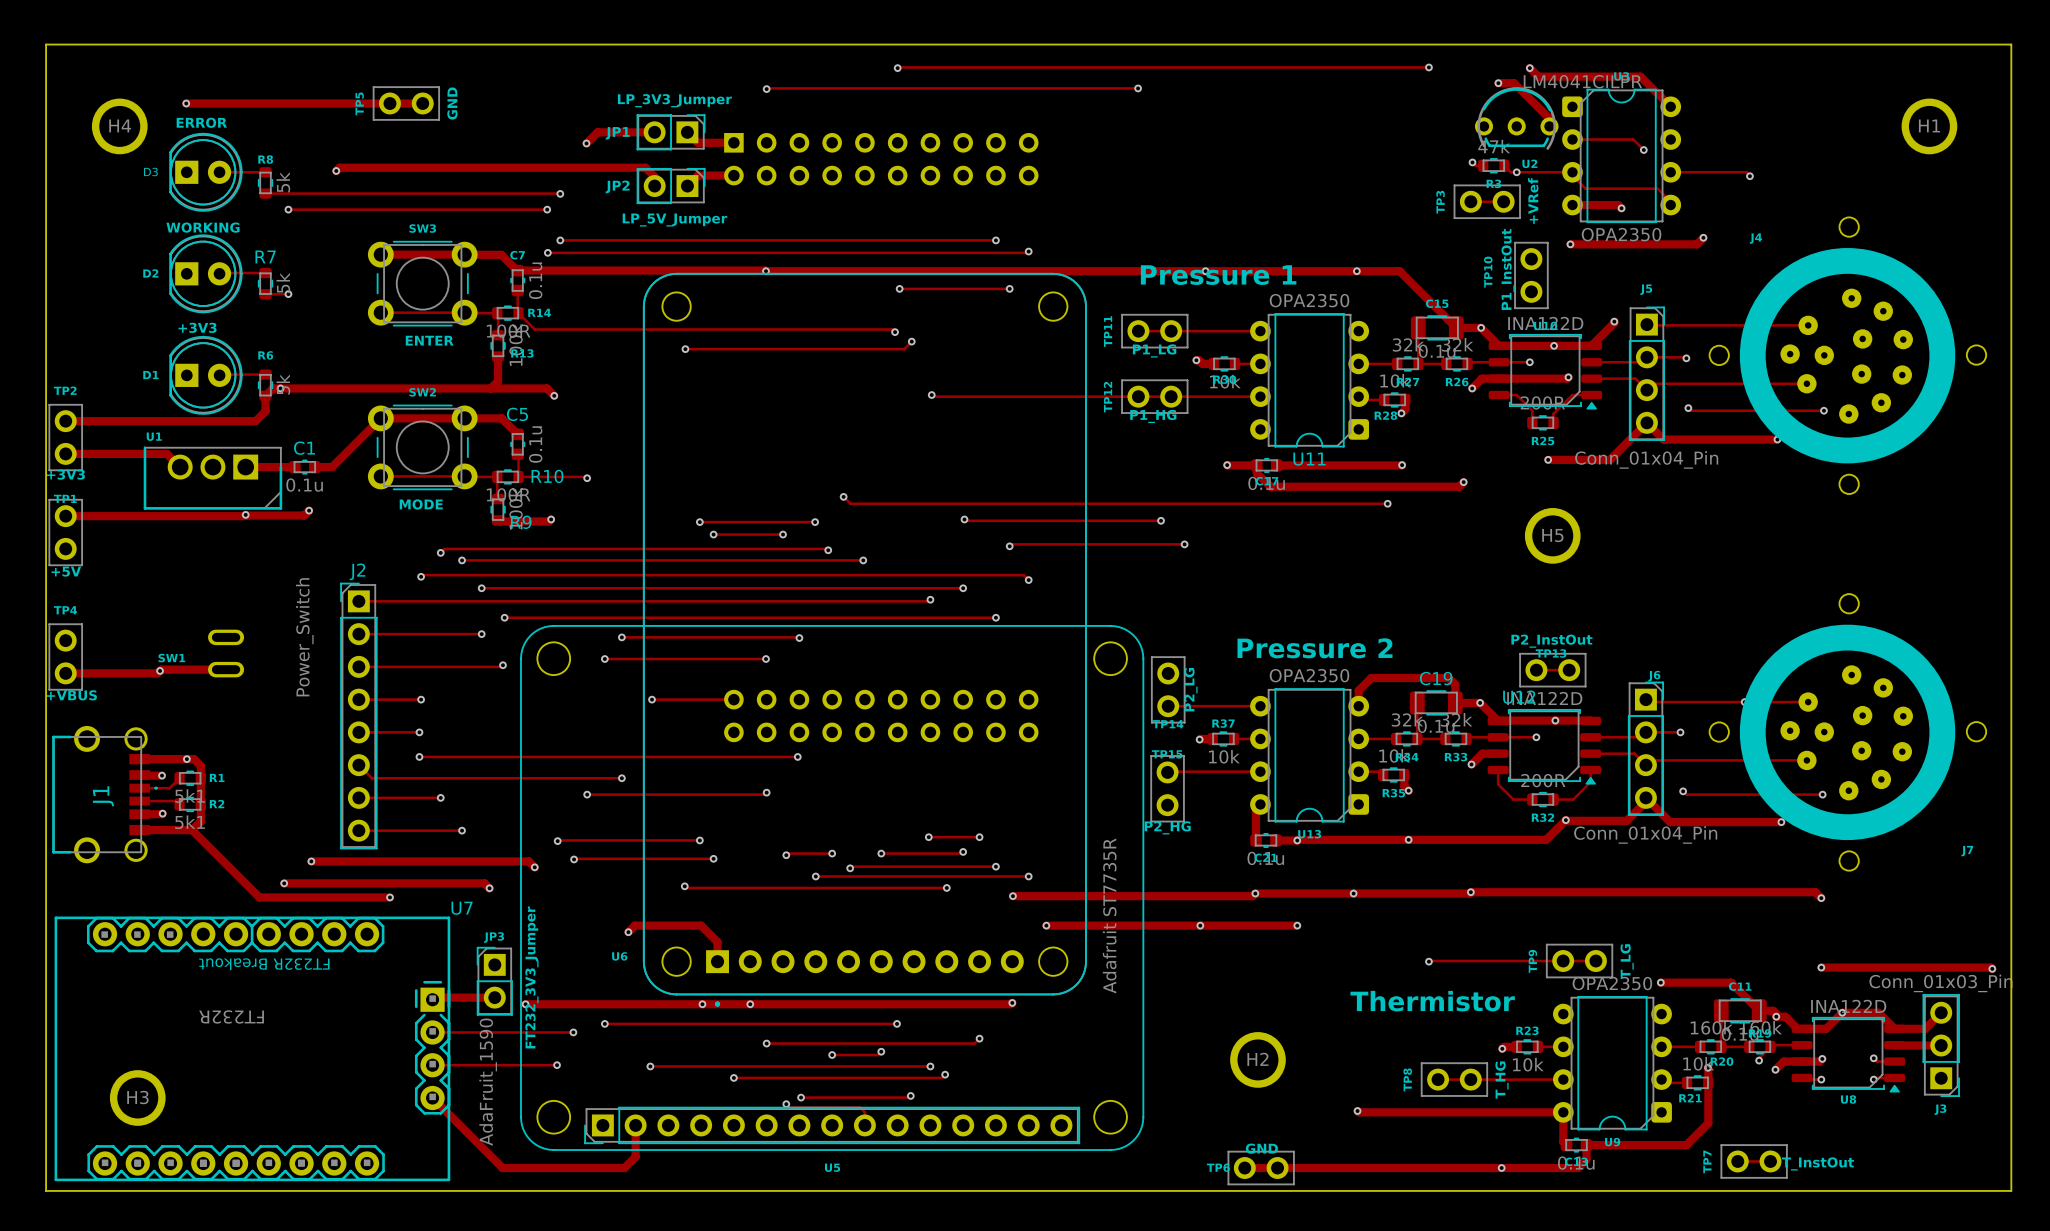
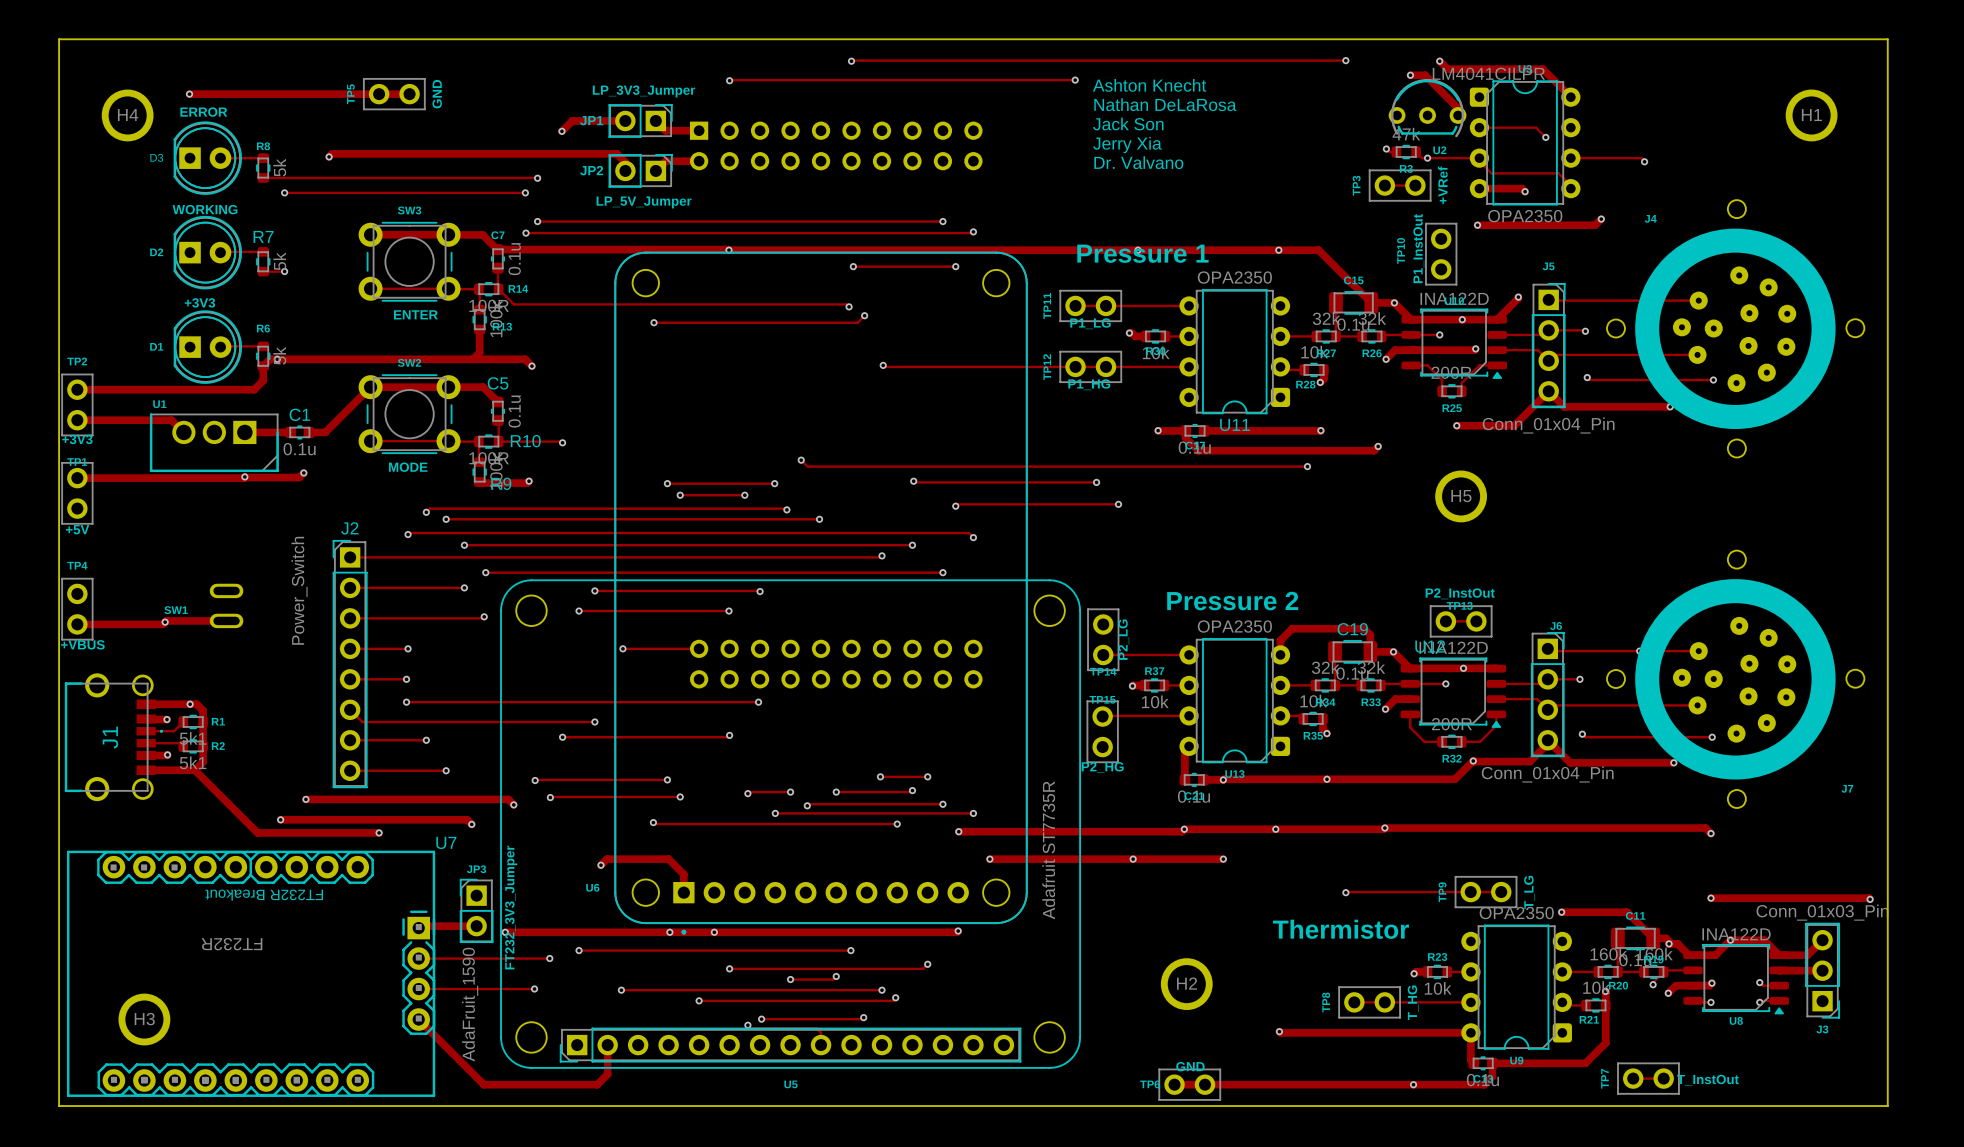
text: none -> Ashton Knecht (1149, 85)
text: none -> Nathan DeLaRosa (1165, 104)
text: none -> Jack Son (1128, 123)
text: none -> Jerry Xia (1127, 145)
text: none -> Dr. Valvano (1138, 162)

